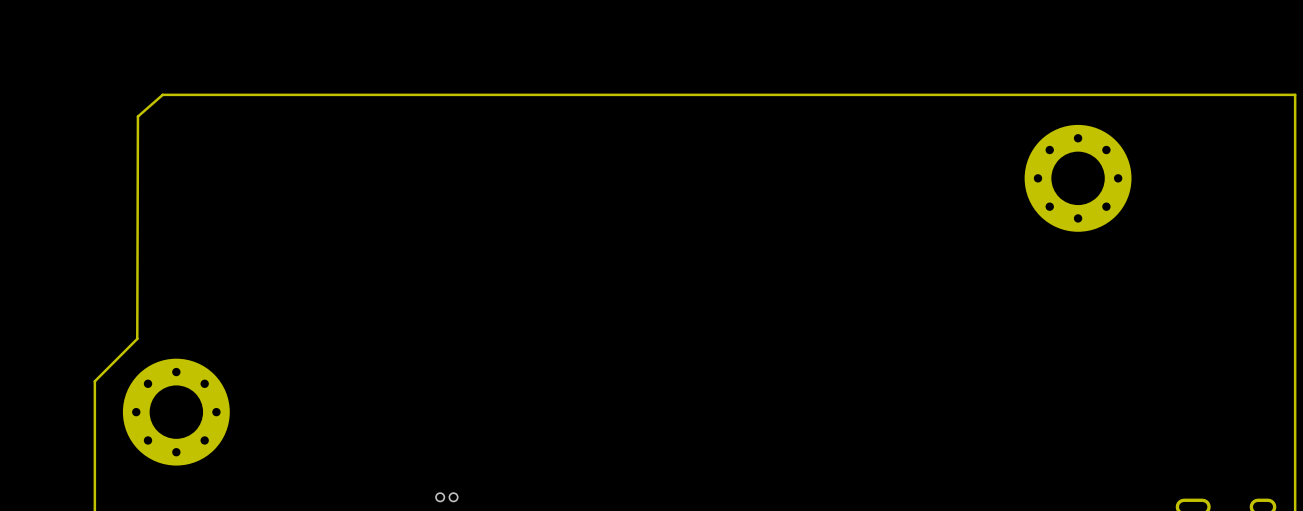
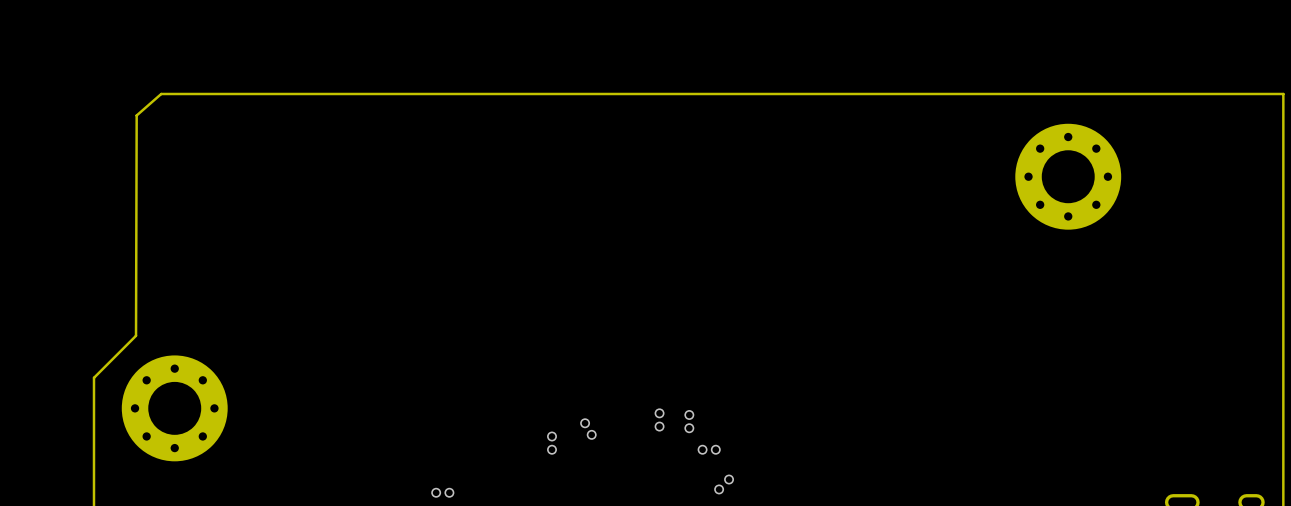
via: none -> (659, 413)
via: none -> (689, 414)
via: none -> (585, 423)
via: none -> (659, 426)
via: none -> (689, 428)
via: none -> (591, 434)
via: none -> (551, 436)
via: none -> (551, 449)
via: none -> (702, 449)
via: none -> (715, 449)
via: none -> (729, 479)
via: none -> (719, 489)

